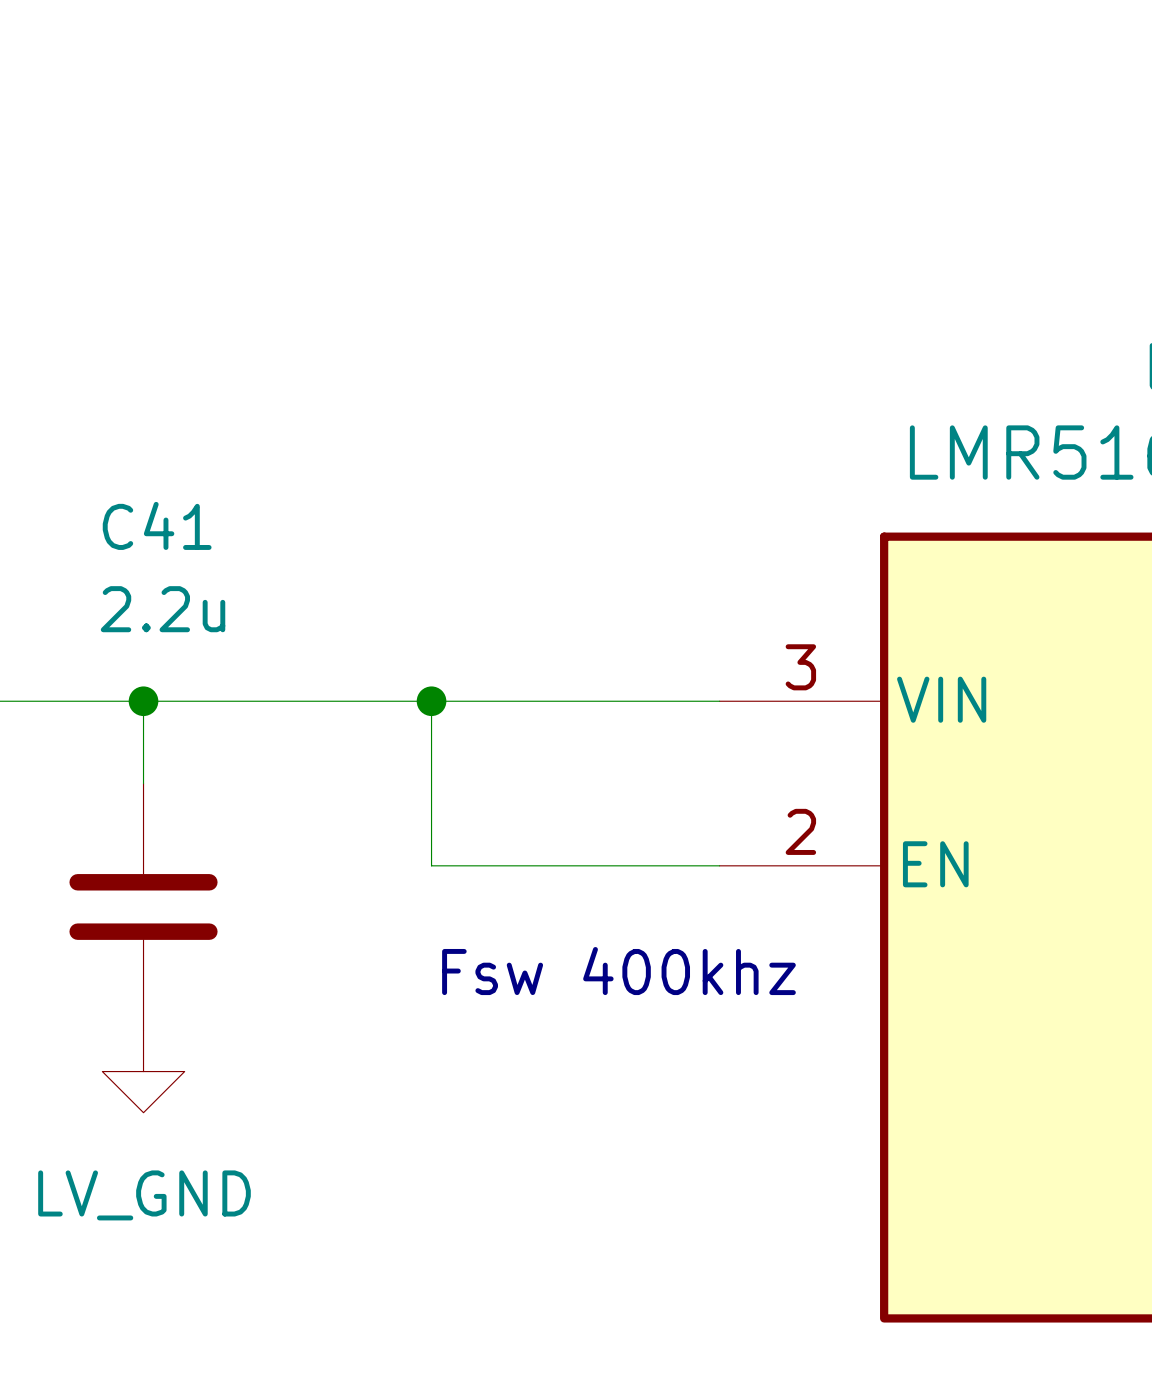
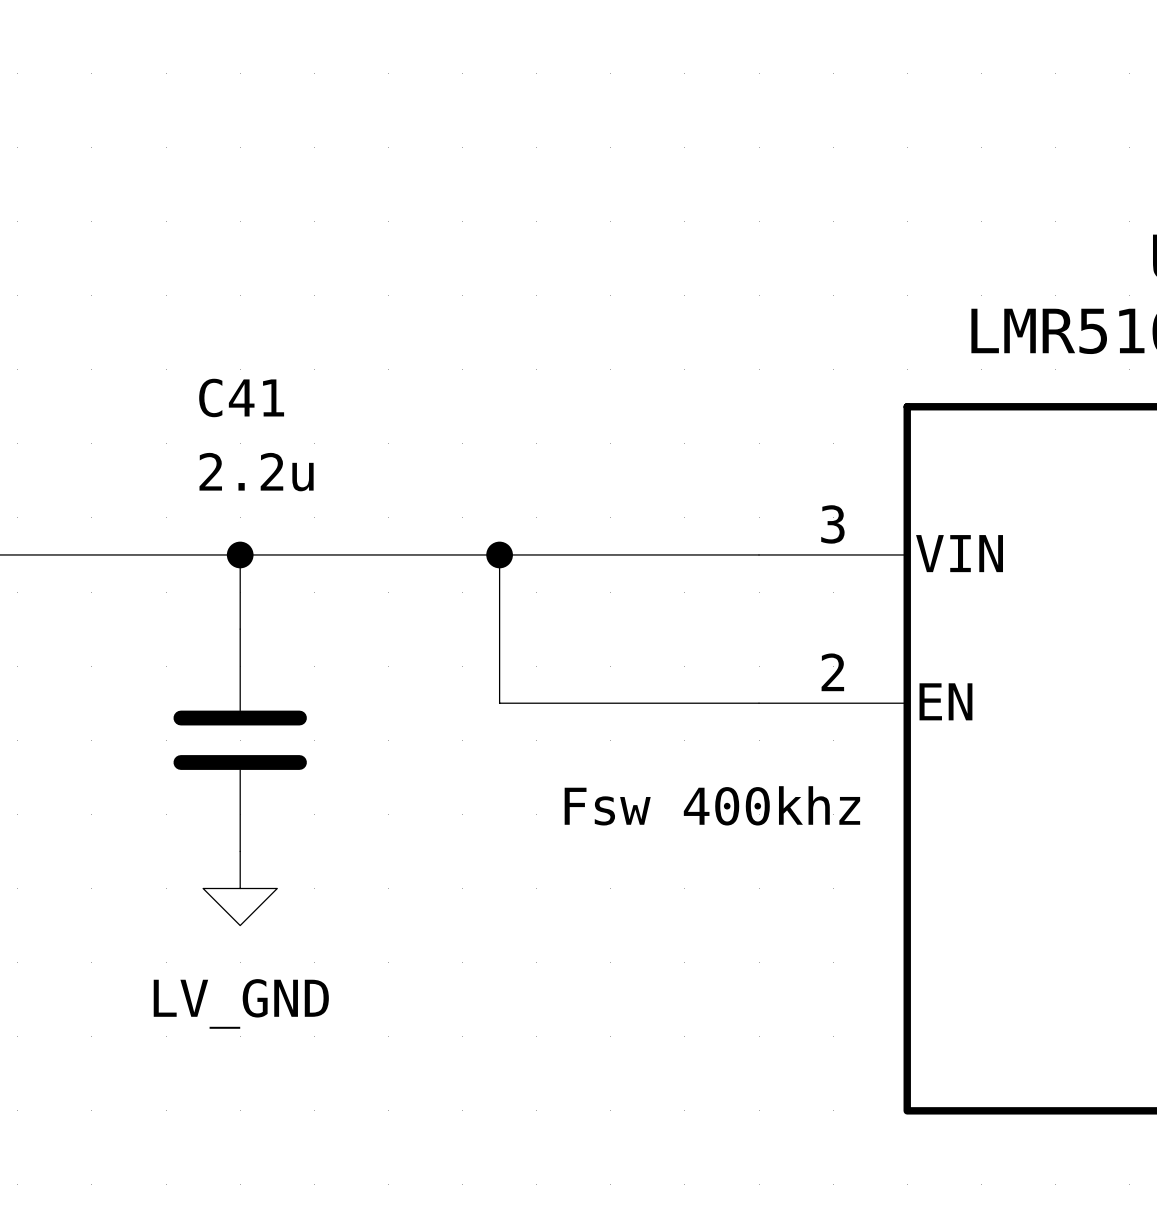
text position: Fsw 400khz (618, 971) -> Fsw 400khz (712, 805)

